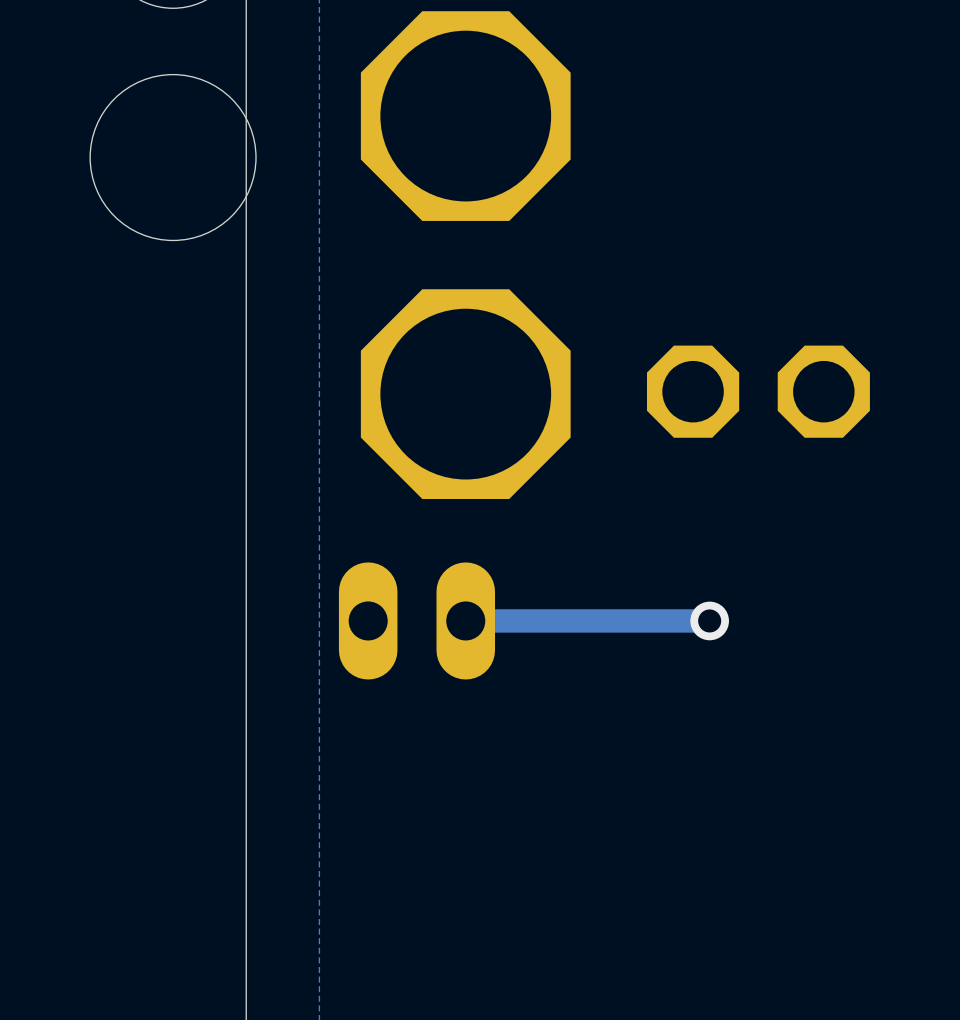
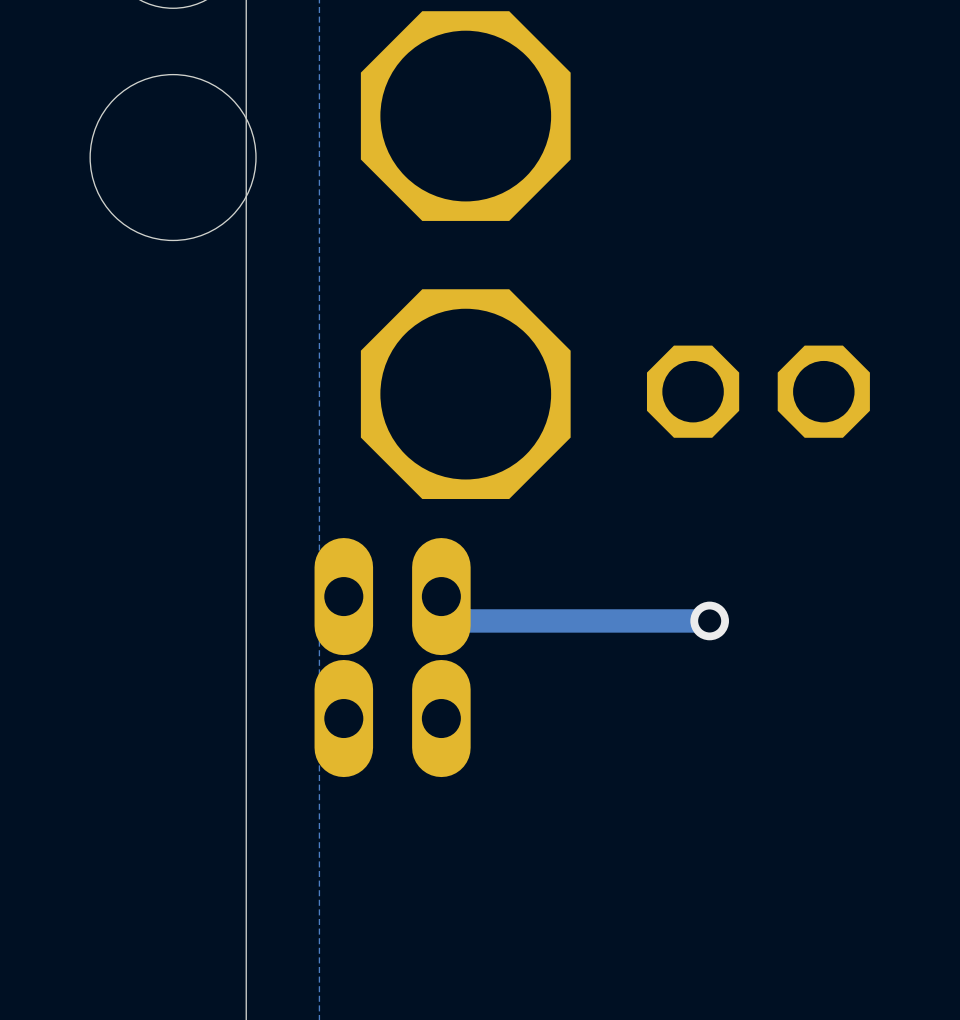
part position: (416, 620) -> (392, 596)
part: none -> (392, 718)

